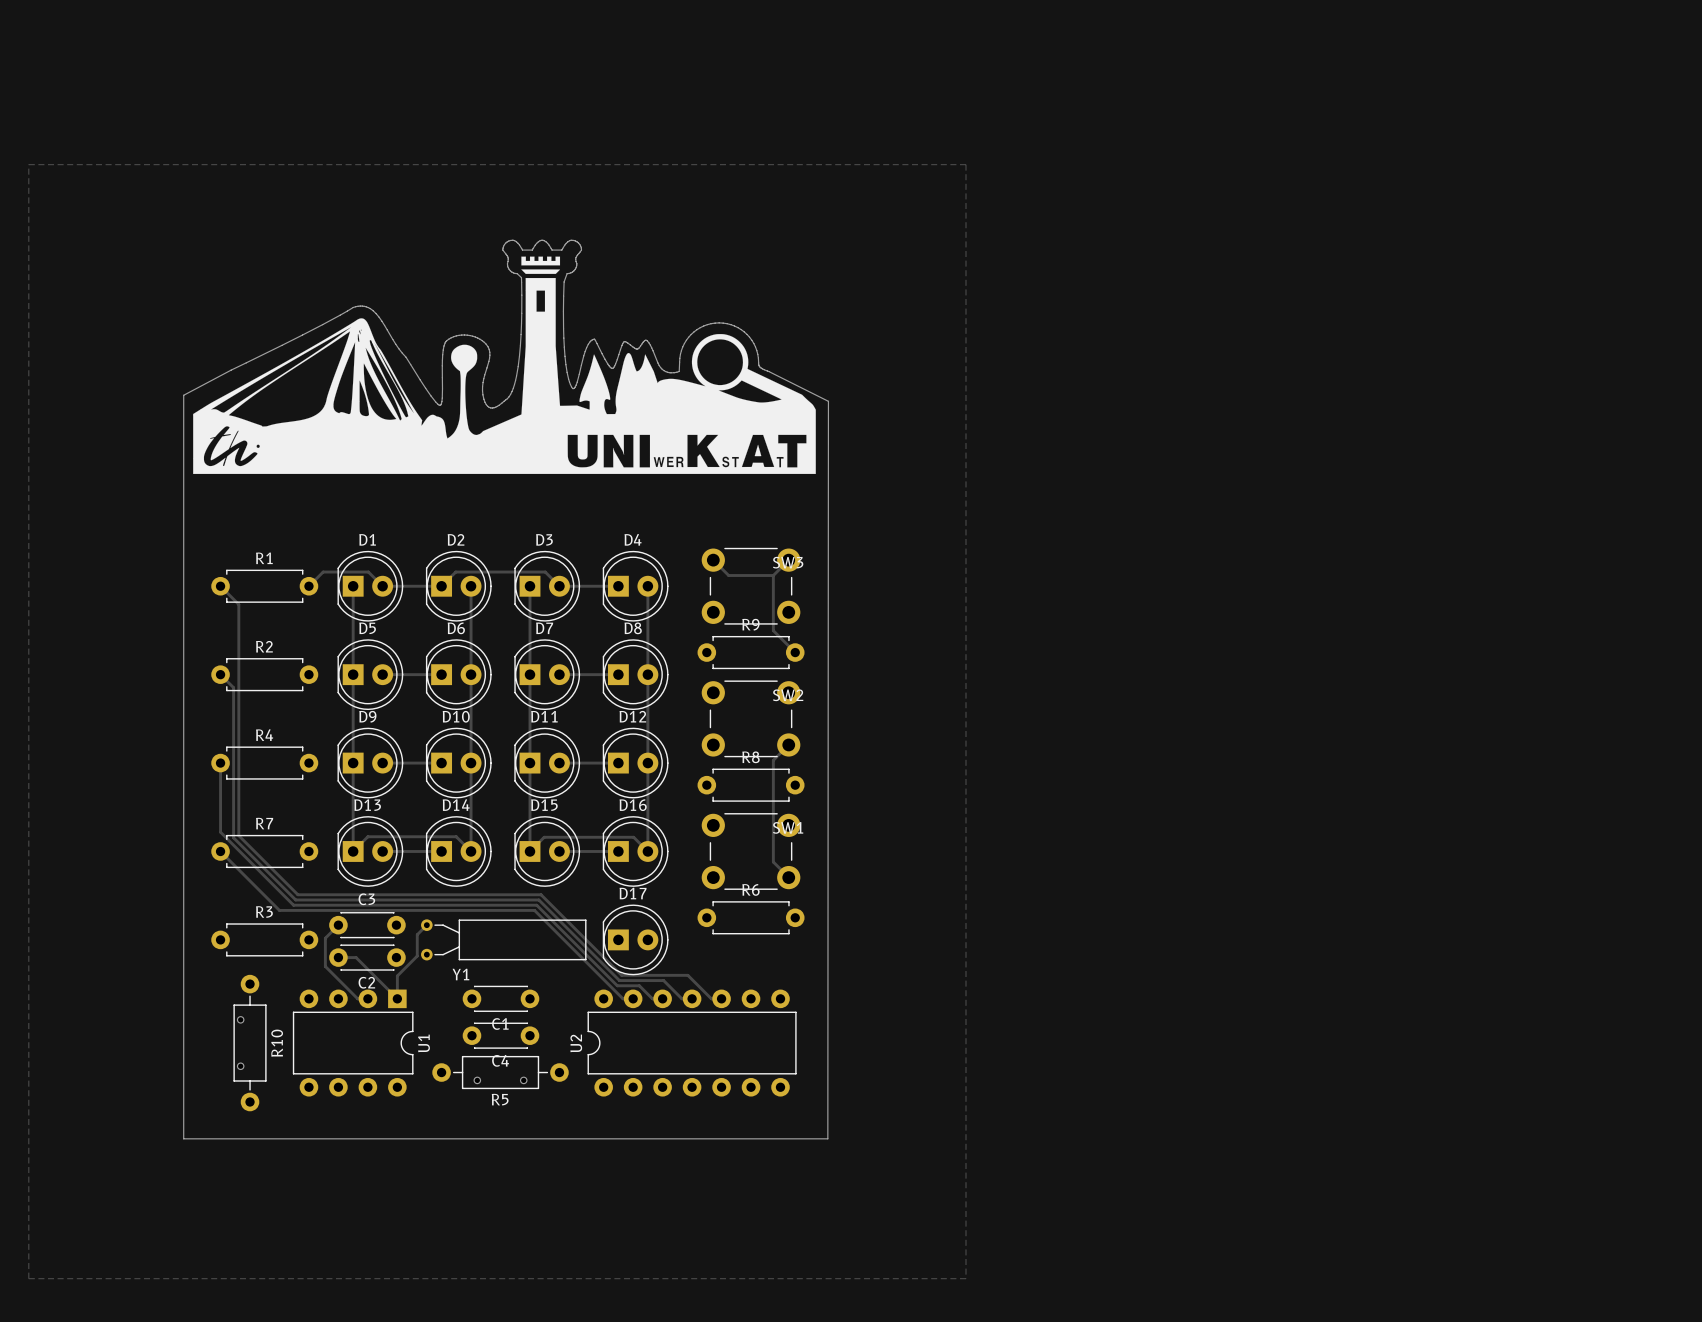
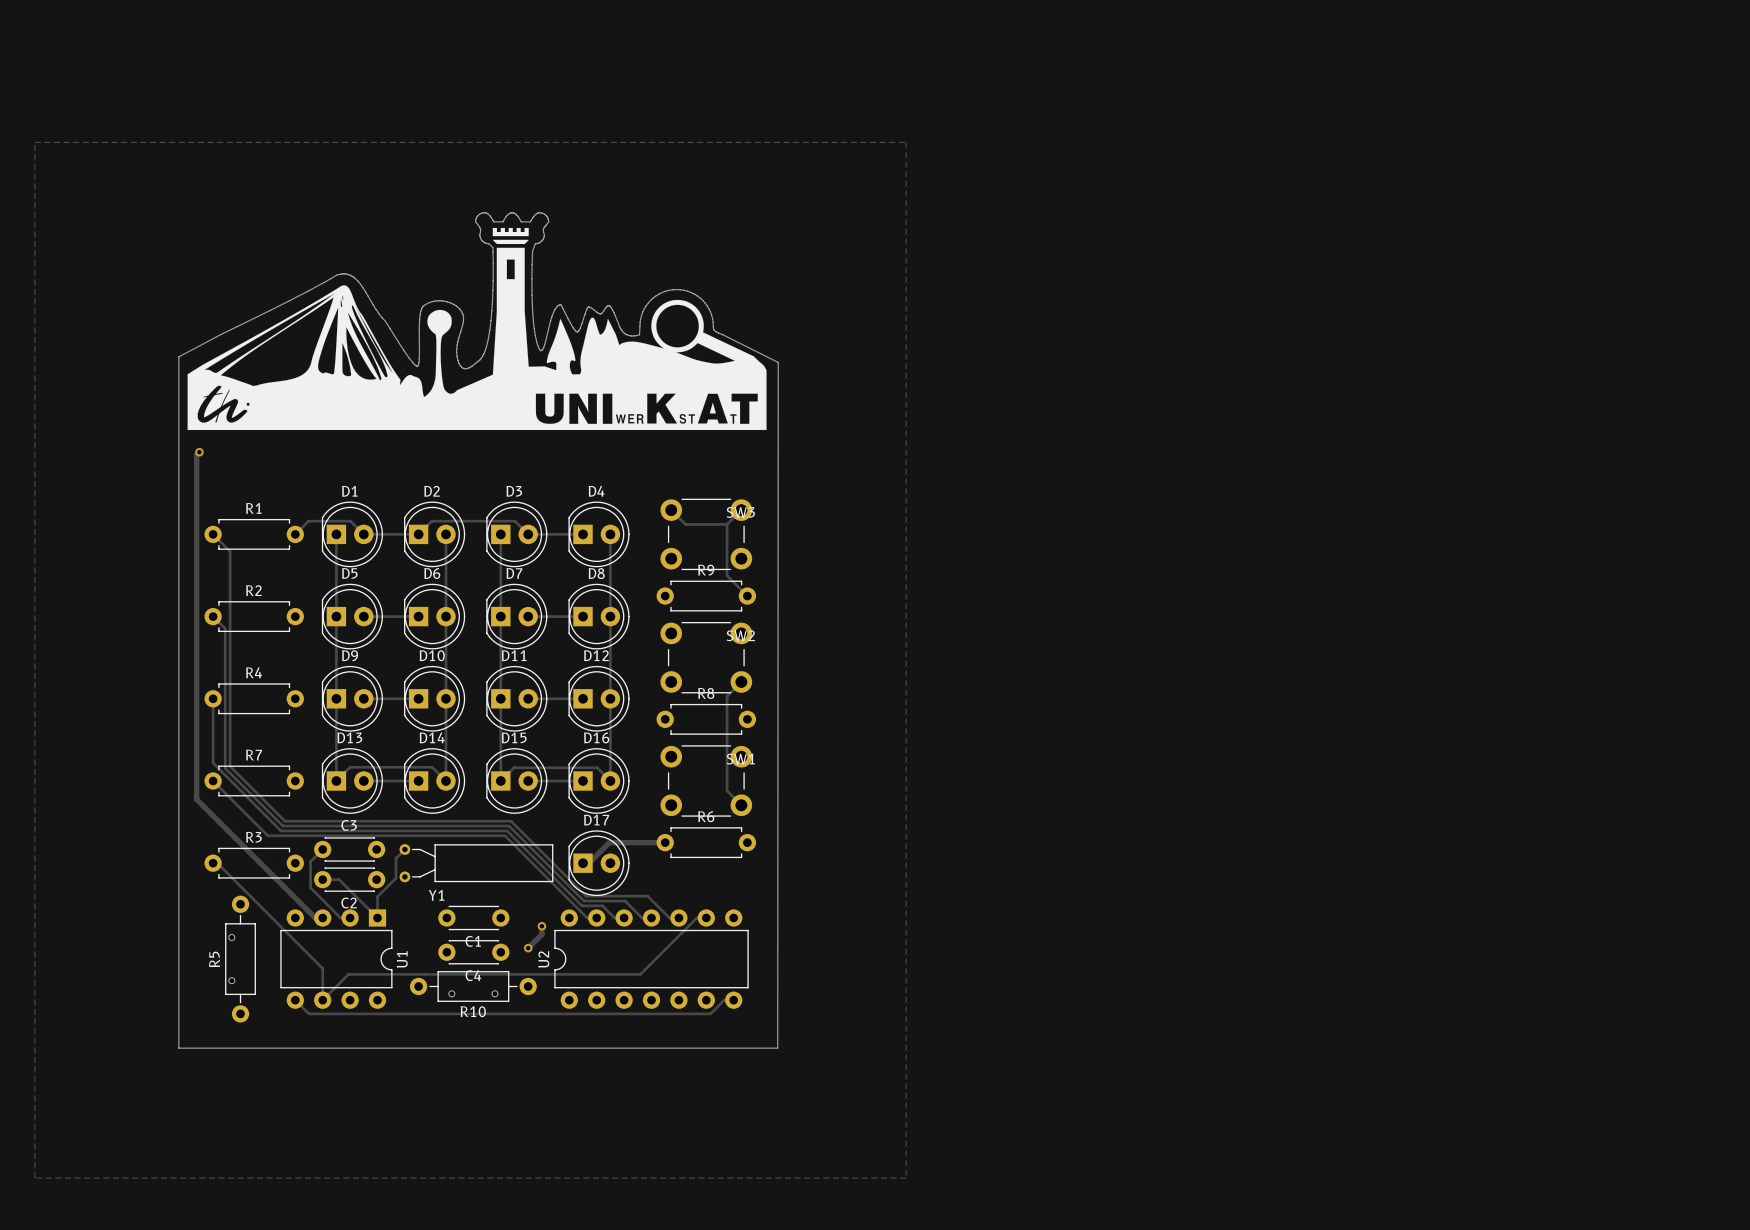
track: none -> (199, 452) (196, 454) (196, 799) (315, 917) (322, 917)
via: none -> (199, 452)
track: none -> (665, 842) (609, 842) (588, 863) (583, 863)
track: none -> (213, 863) (217, 863) (322, 968) (322, 1000) (348, 974) (640, 974) (696, 917) (706, 917)
track: none -> (541, 926) (541, 934) (528, 948)
via: none -> (541, 926)
via: none -> (528, 948)
R10 name: R10 (277, 1043) -> R5 (214, 959)
track: none -> (295, 1000) (309, 1013) (710, 1013) (724, 1000) (733, 1000)
R5 name: R5 (500, 1099) -> R10 (473, 1011)

